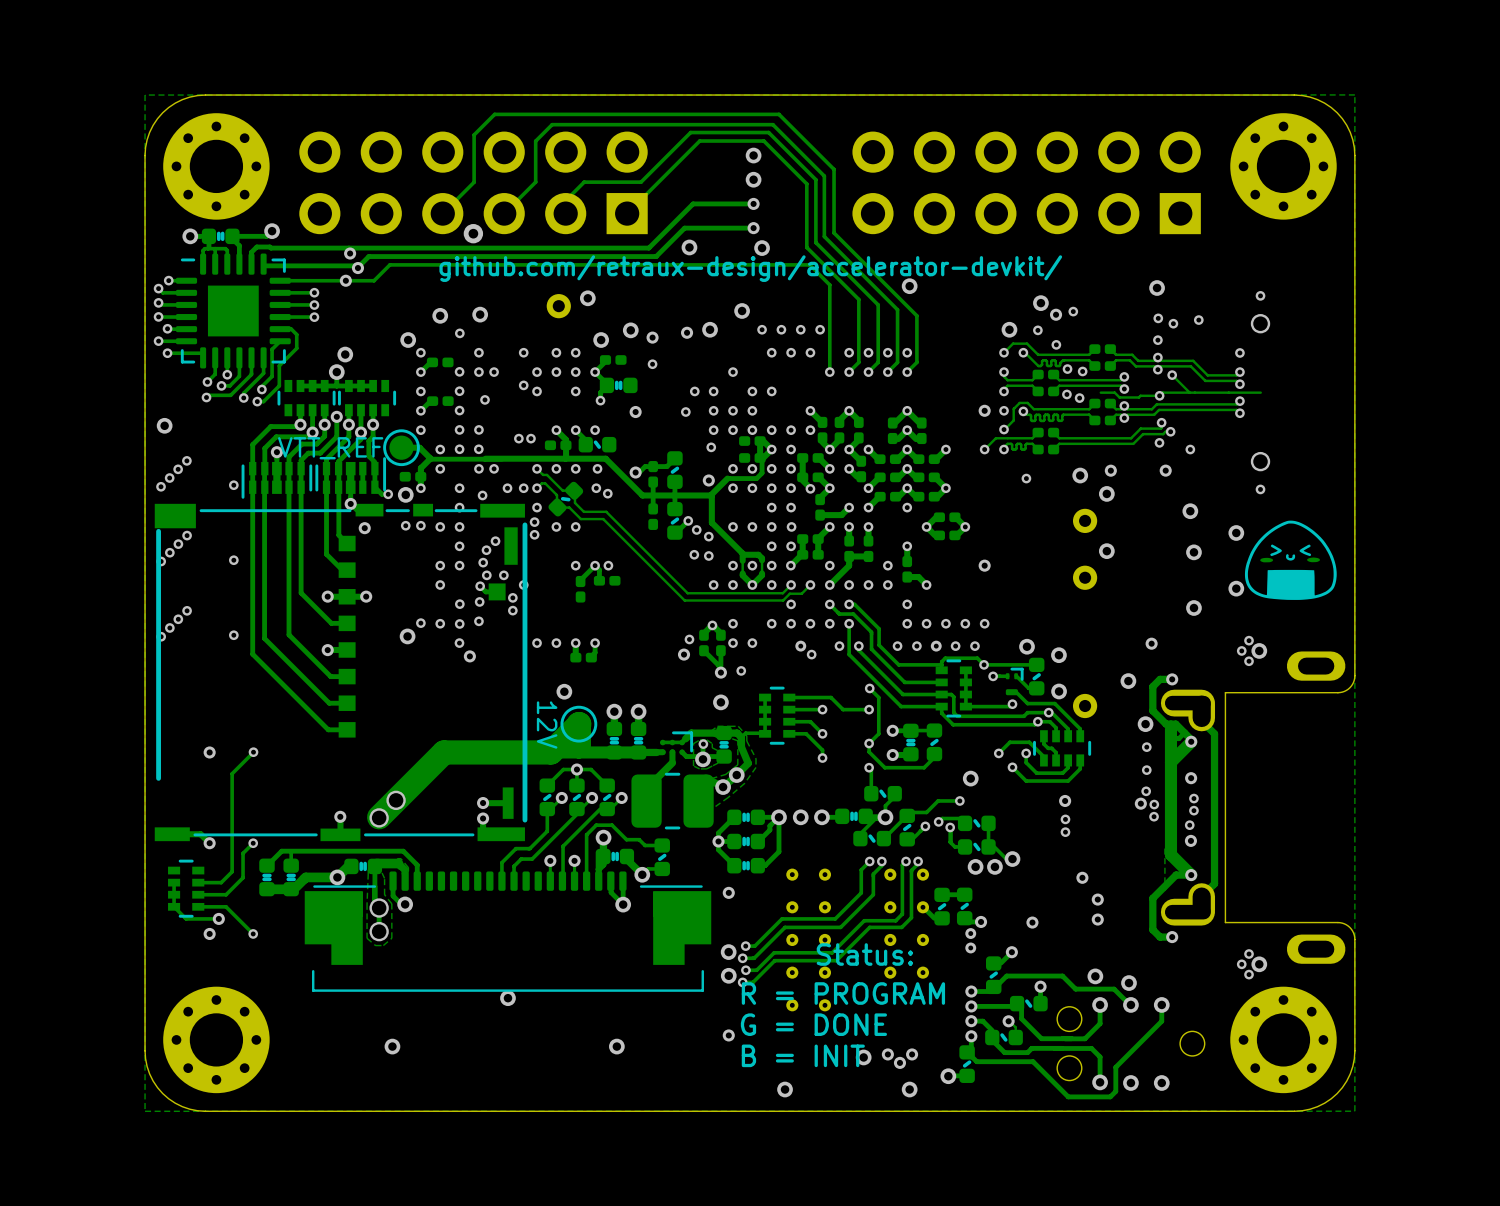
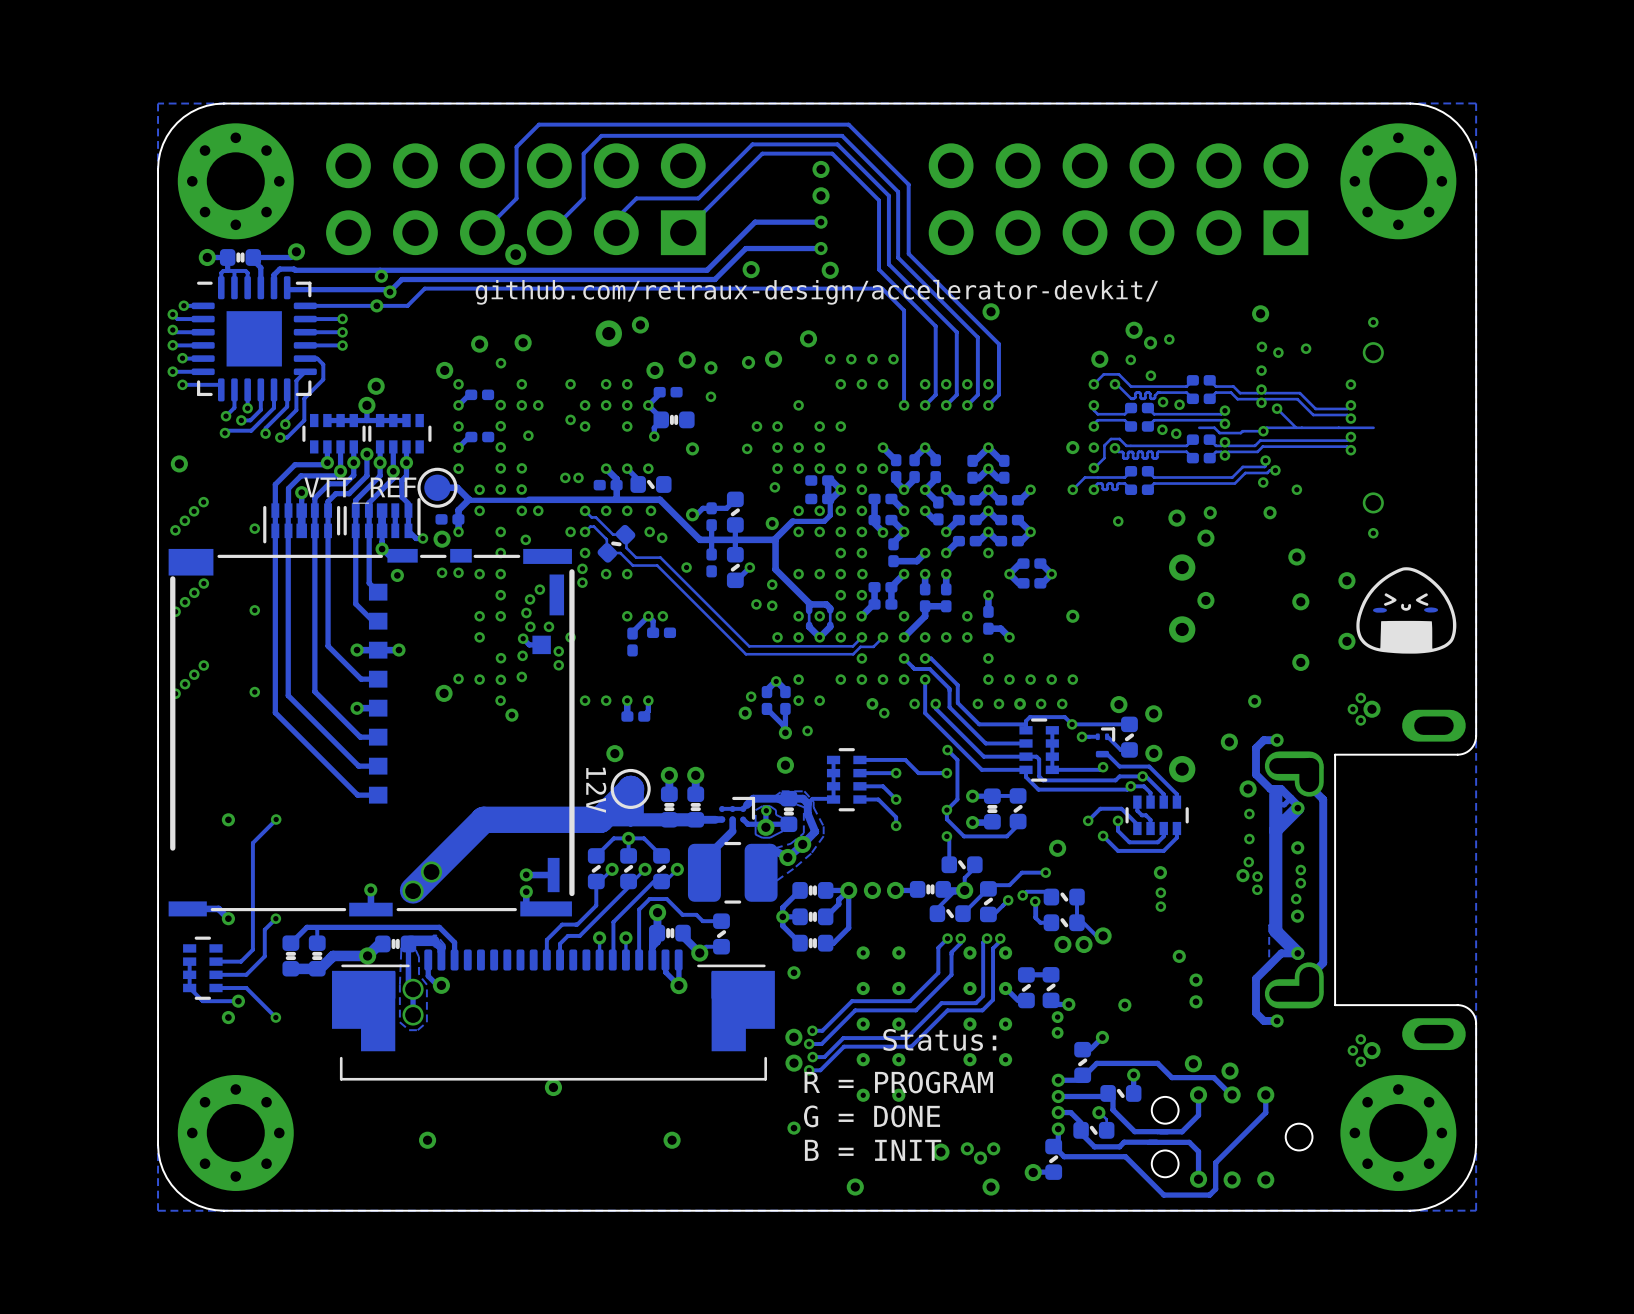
via: (507, 488) -> none
via: none -> (686, 567)
via: (696, 529) -> none

